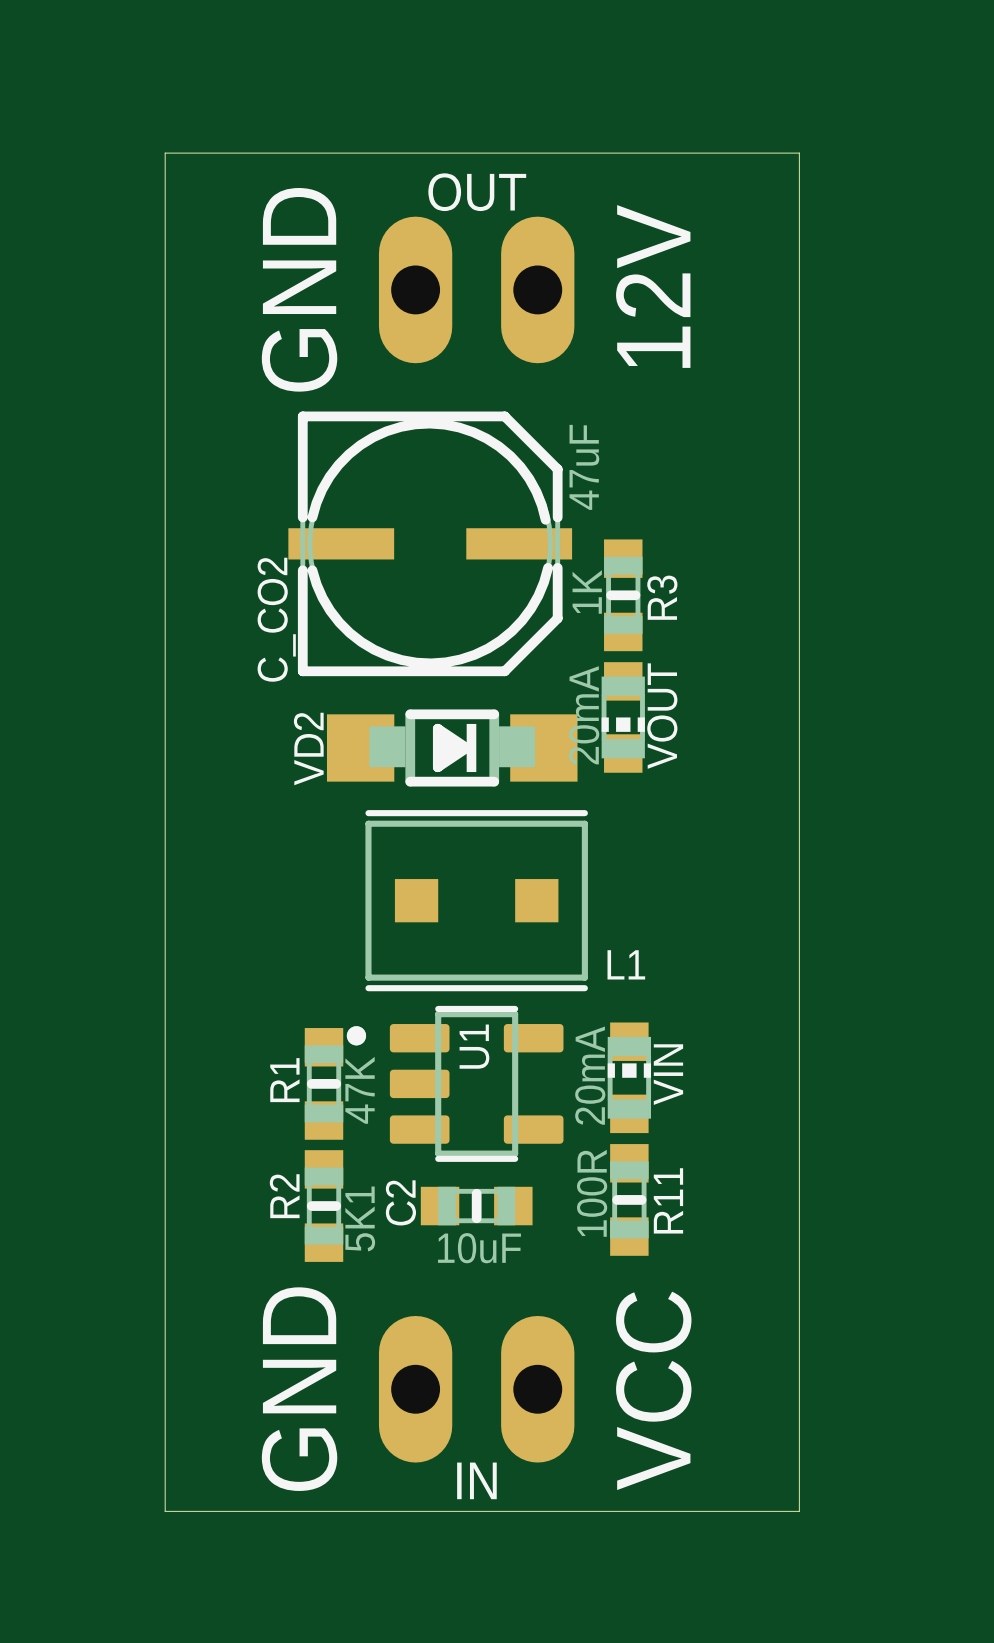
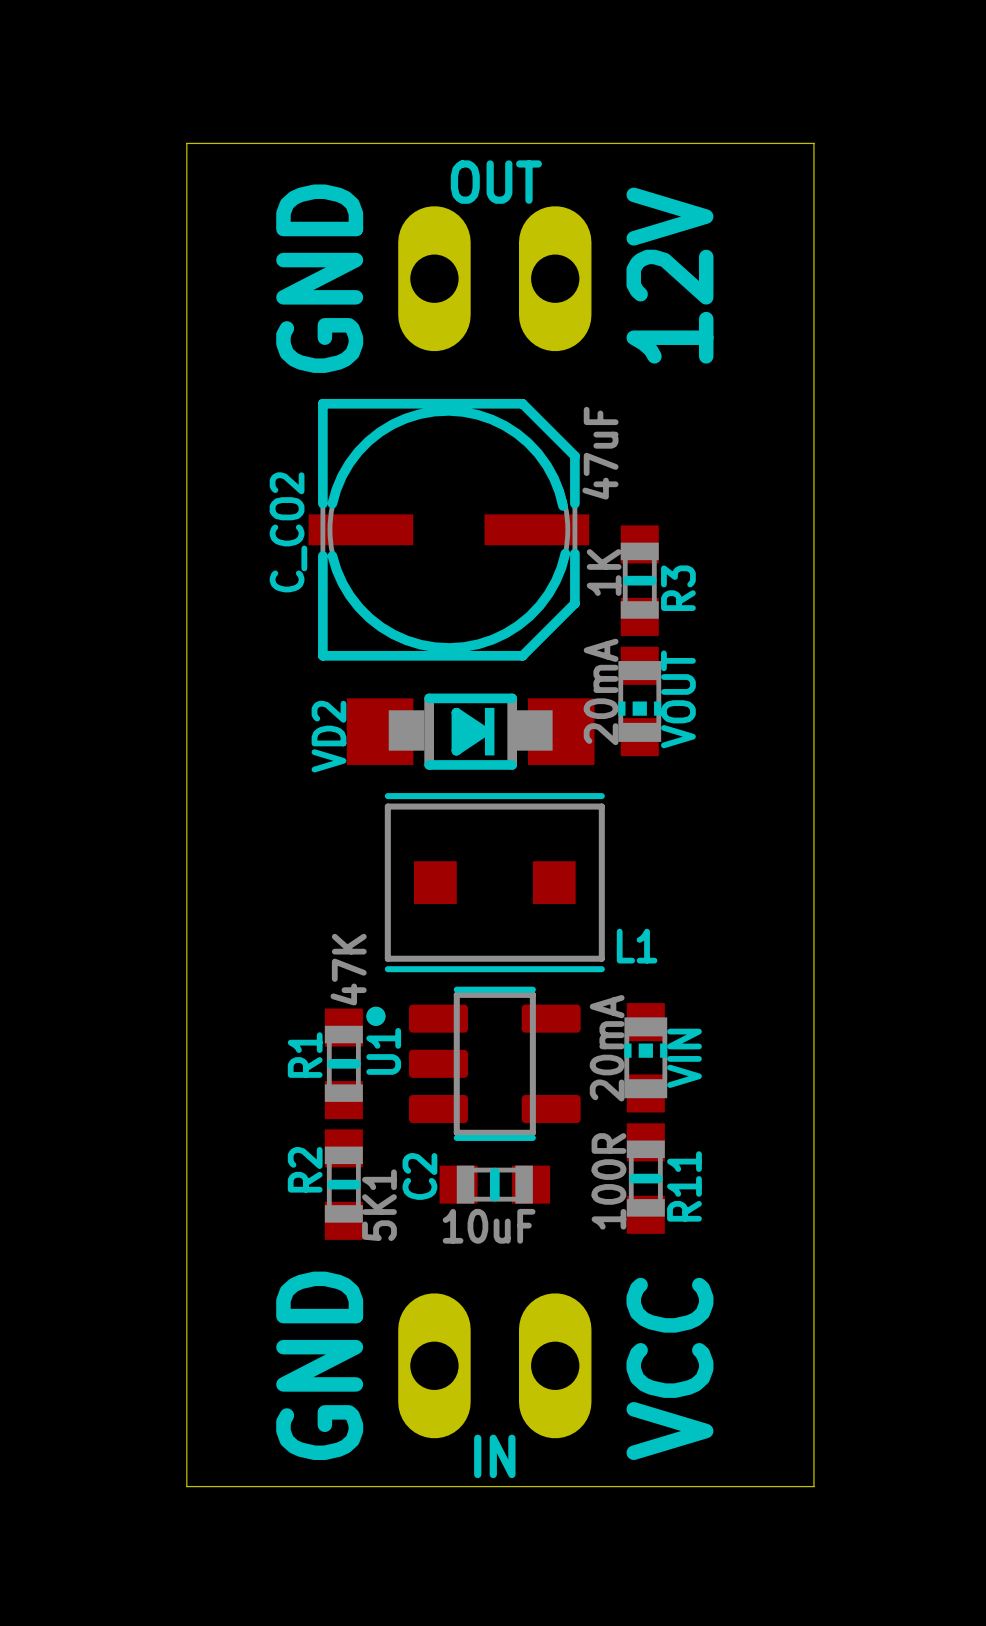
C_CO2 name position: C_CO2 (276, 619) -> C_CO2 (288, 532)
U1 name position: U1 (474, 1046) -> U1 (383, 1051)
R1 value position: 47K (360, 1090) -> 47K (348, 969)

